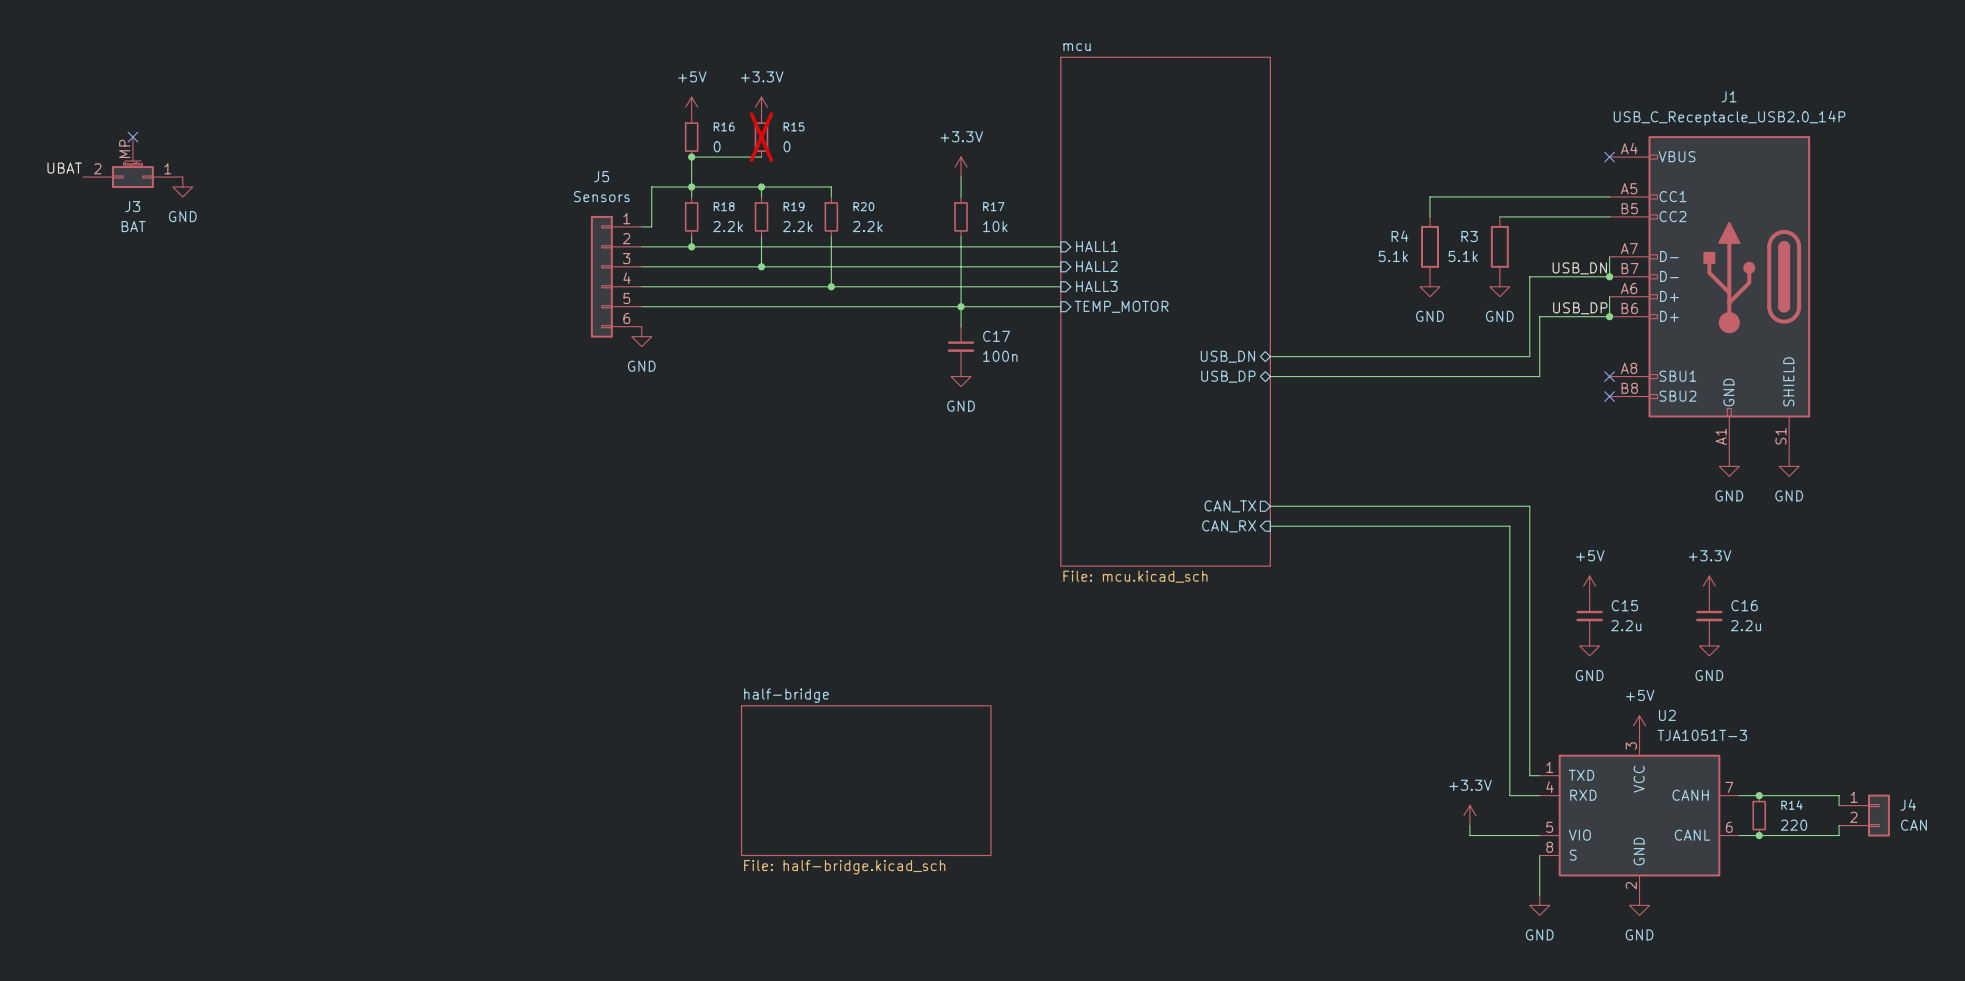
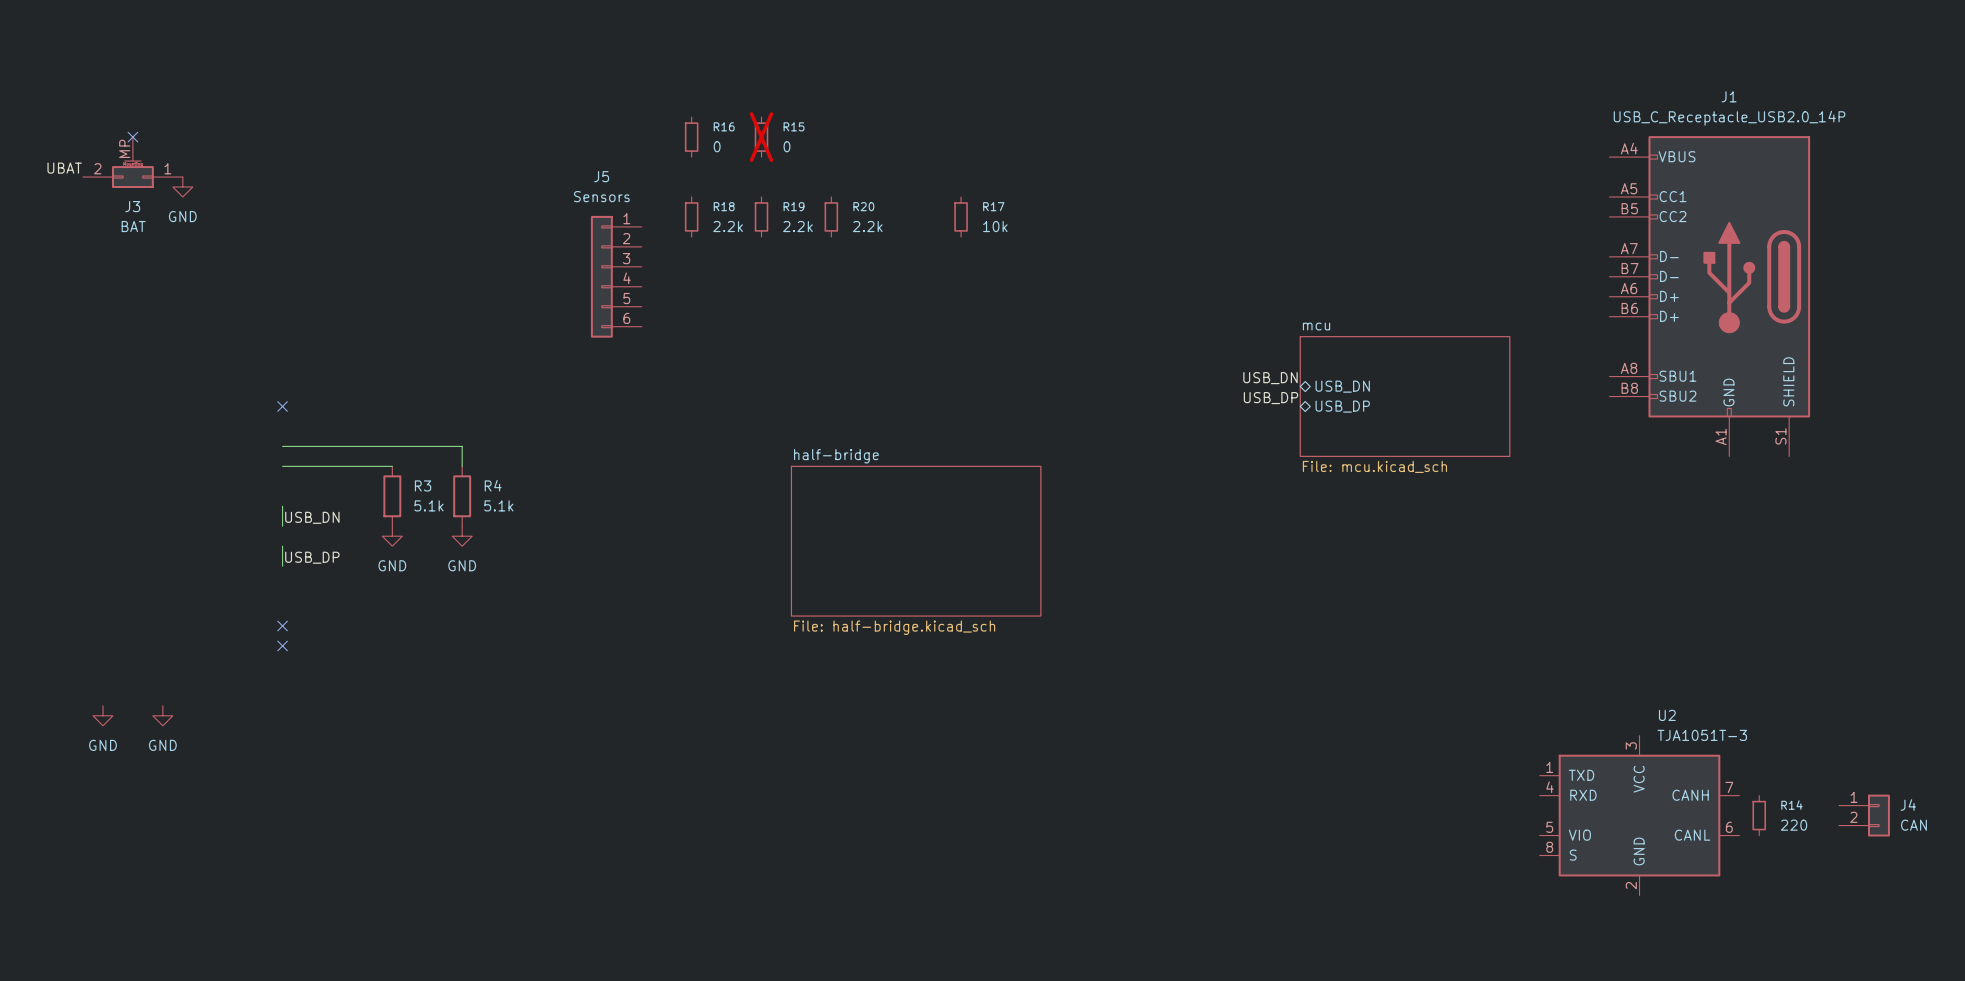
power symbol: +5V (691, 107) -> none
power symbol: +3.3V (761, 107) -> none
junction: (691, 157) -> none
wire: (761, 157) (691, 157) (691, 196) -> none
no-connect mark: (1609, 157) -> none
power symbol: +3.3V (961, 167) -> none
wire: (961, 177) (961, 196) -> none
junction: (691, 187) -> none
wire: (761, 187) (761, 196) -> none
junction: (761, 187) -> none
wire: (831, 196) (831, 187) (651, 187) (651, 226) (641, 226) -> none
wire: (1609, 196) (1429, 196) (1429, 216) -> none
wire: (1499, 216) (1609, 216) -> none
wire: (691, 236) (691, 246) -> none
wire: (761, 236) (761, 266) -> none
wire: (831, 236) (831, 286) -> none
wire: (961, 236) (961, 326) -> none
R4 name position: R4 (1399, 236) -> R4 (493, 485)
R3 name position: R3 (1469, 236) -> R3 (423, 485)
wire: (641, 246) (1060, 246) -> none
junction: (691, 246) -> none
sheet pin: HALL1 (1096, 246) -> none
R4 position: (1429, 246) -> (462, 496)
R3 position: (1499, 246) -> (392, 496)
R4 value position: 5.1k (1393, 256) -> 5.1k (498, 505)
R3 value position: 5.1k (1463, 256) -> 5.1k (428, 505)
wire: (1609, 256) (1609, 276) (1529, 276) (1529, 356) (1270, 356) -> none
wire: (641, 266) (1060, 266) -> none
junction: (761, 266) -> none
sheet pin: HALL2 (1096, 266) -> none
label: USB_DN (1579, 268) -> none
junction: (1609, 276) -> none
wire: (641, 286) (1060, 286) -> none
junction: (831, 286) -> none
sheet pin: HALL3 (1096, 286) -> none
power symbol: GND (1429, 286) -> none
power symbol: GND (1499, 286) -> none
wire: (1609, 296) (1609, 316) (1539, 316) (1539, 376) (1270, 376) -> none
wire: (641, 306) (1060, 306) -> none
junction: (961, 306) -> none
sheet pin: TEMP_MOTOR (1121, 306) -> none
label: USB_DP (1580, 308) -> none
sheet mcu: File: mcu.kicad_sch (1165, 311) -> none
junction: (1609, 316) -> none
power symbol: GND (641, 336) -> none
C17: 100n (961, 346) -> none
sheet pin rotation: 0° (1227, 356) -> 180° (1342, 386)
sheet pin position: USB_DN (1227, 356) -> USB_DN (1342, 386)
power symbol: GND (961, 376) -> none
sheet pin rotation: 0° (1228, 376) -> 180° (1342, 406)
sheet pin position: USB_DP (1228, 376) -> USB_DP (1342, 406)
no-connect mark: (1609, 376) -> none
label: none -> USB_DN (1270, 378)
sheet mcu: none -> File: mcu.kicad_sch (1405, 396)
no-connect mark: (1609, 396) -> none
label: none -> USB_DP (1270, 398)
no-connect mark: none -> (282, 406)
wire: none -> (282, 446) (462, 446) (462, 466)
wire: none -> (282, 466) (392, 466)
power symbol: GND (1729, 466) -> none
power symbol: GND (1789, 466) -> none
wire: none -> (282, 506) (282, 526)
sheet pin: CAN_TX (1230, 506) -> none
wire: (1270, 506) (1529, 506) (1529, 775) (1539, 775) -> none
label: none -> USB_DN (312, 517)
sheet pin: CAN_RX (1229, 526) -> none
wire: (1270, 526) (1509, 526) (1509, 795) (1539, 795) -> none
power symbol: none -> GND (392, 536)
power symbol: none -> GND (462, 536)
sheet half-bridge: none -> File: half-bridge.kicad_sch (916, 541)
wire: none -> (282, 546) (282, 566)
label: none -> USB_DP (312, 557)
power symbol: +5V (1589, 586) -> none
power symbol: +3.3V (1709, 586) -> none
C15: 2.2u (1589, 616) -> none
C16: 2.2u (1709, 616) -> none
no-connect mark: none -> (282, 626)
no-connect mark: none -> (282, 645)
power symbol: GND (1589, 645) -> none
power symbol: GND (1709, 645) -> none
power symbol: none -> GND (102, 715)
power symbol: none -> GND (162, 715)
power symbol: +5V (1639, 725) -> none
sheet half-bridge: File: half-bridge.kicad_sch (866, 780) -> none
wire: (1739, 795) (1839, 795) (1839, 805) -> none
junction: (1759, 795) -> none
power symbol: +3.3V (1469, 815) -> none
wire: (1469, 825) (1469, 835) (1539, 835) -> none
wire: (1839, 825) (1839, 835) (1739, 835) -> none
junction: (1759, 835) -> none
wire: (1539, 855) (1539, 895) -> none
power symbol: GND (1539, 905) -> none
power symbol: GND (1639, 905) -> none

